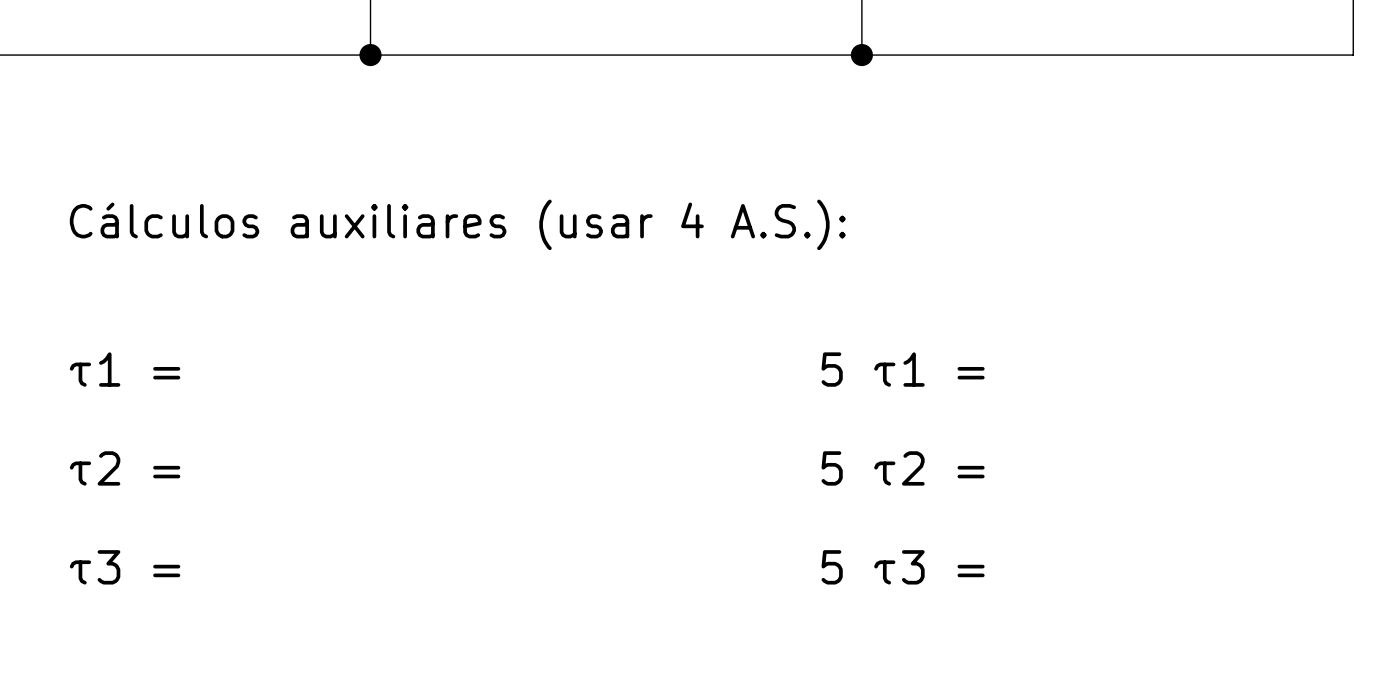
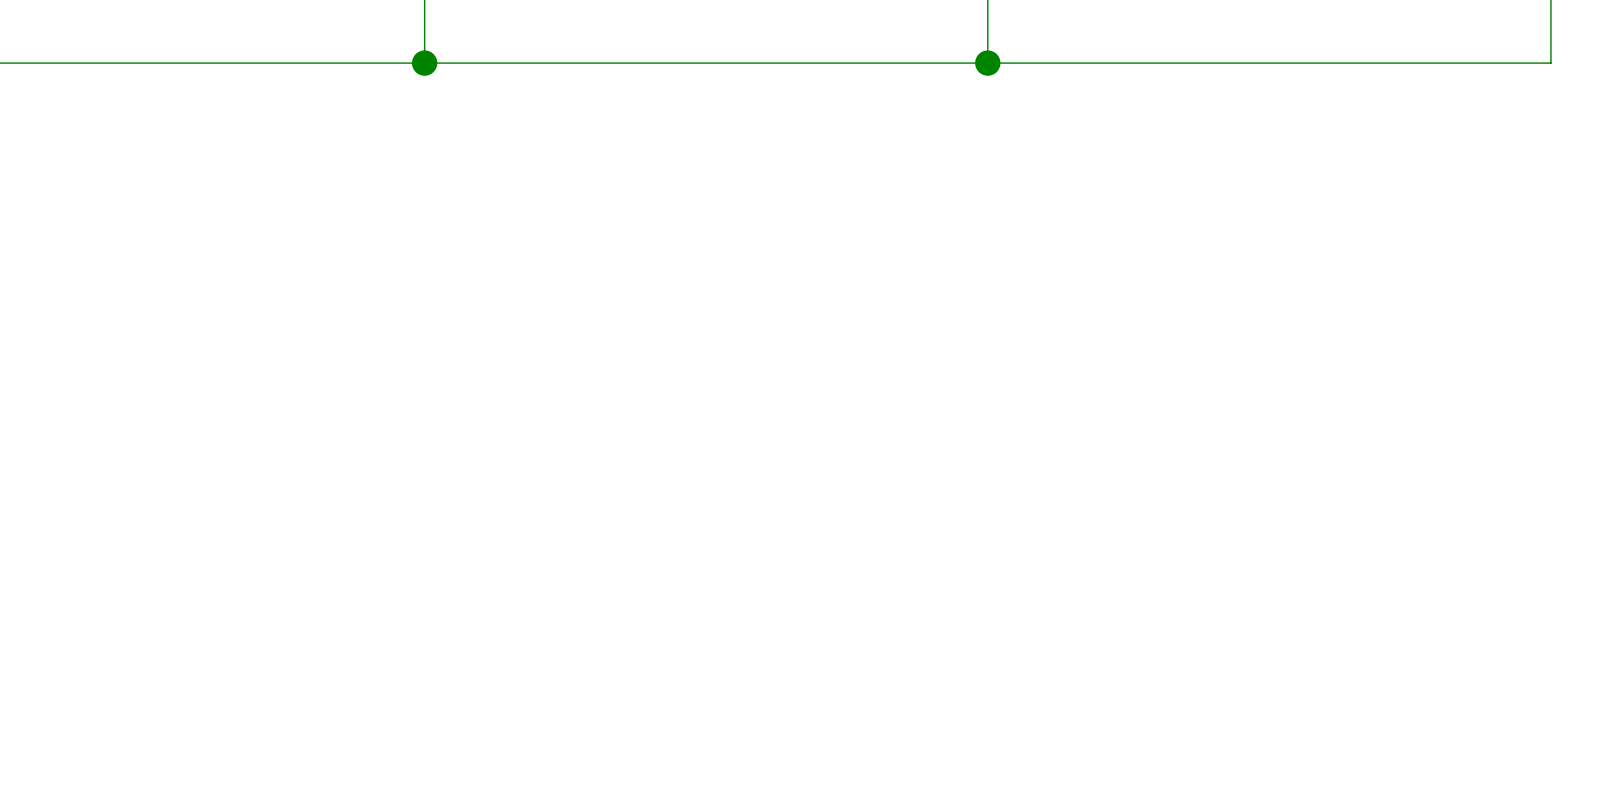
text: Cálculos auxiliares (usar 4 A.S.): (457, 224) -> none
text: τ1 = 5 τ1 = (527, 369) -> none
text: τ2 = 5 τ2 = (527, 468) -> none
text: τ3 = 5 τ3 = (527, 567) -> none

